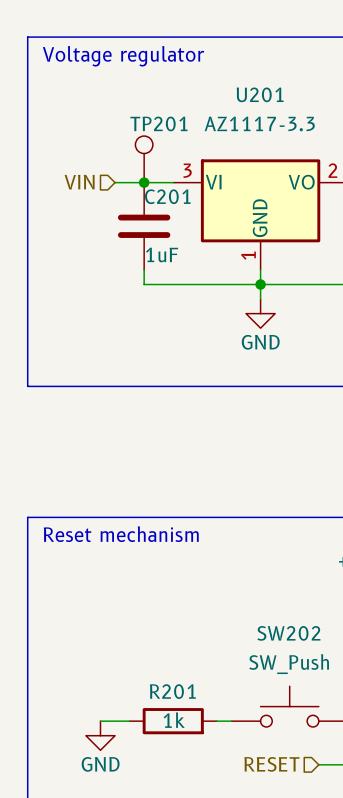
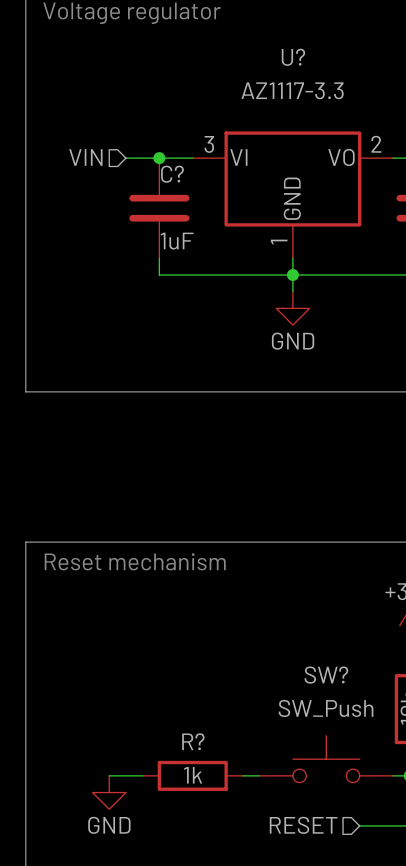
U201 name: U201 (260, 94) -> U? (293, 57)
TP201: (144, 159) -> none
C201 name: C201 (167, 196) -> C? (172, 174)
SW202 name: SW202 (288, 633) -> SW? (326, 675)
R201 name: R201 (172, 691) -> R? (193, 741)

